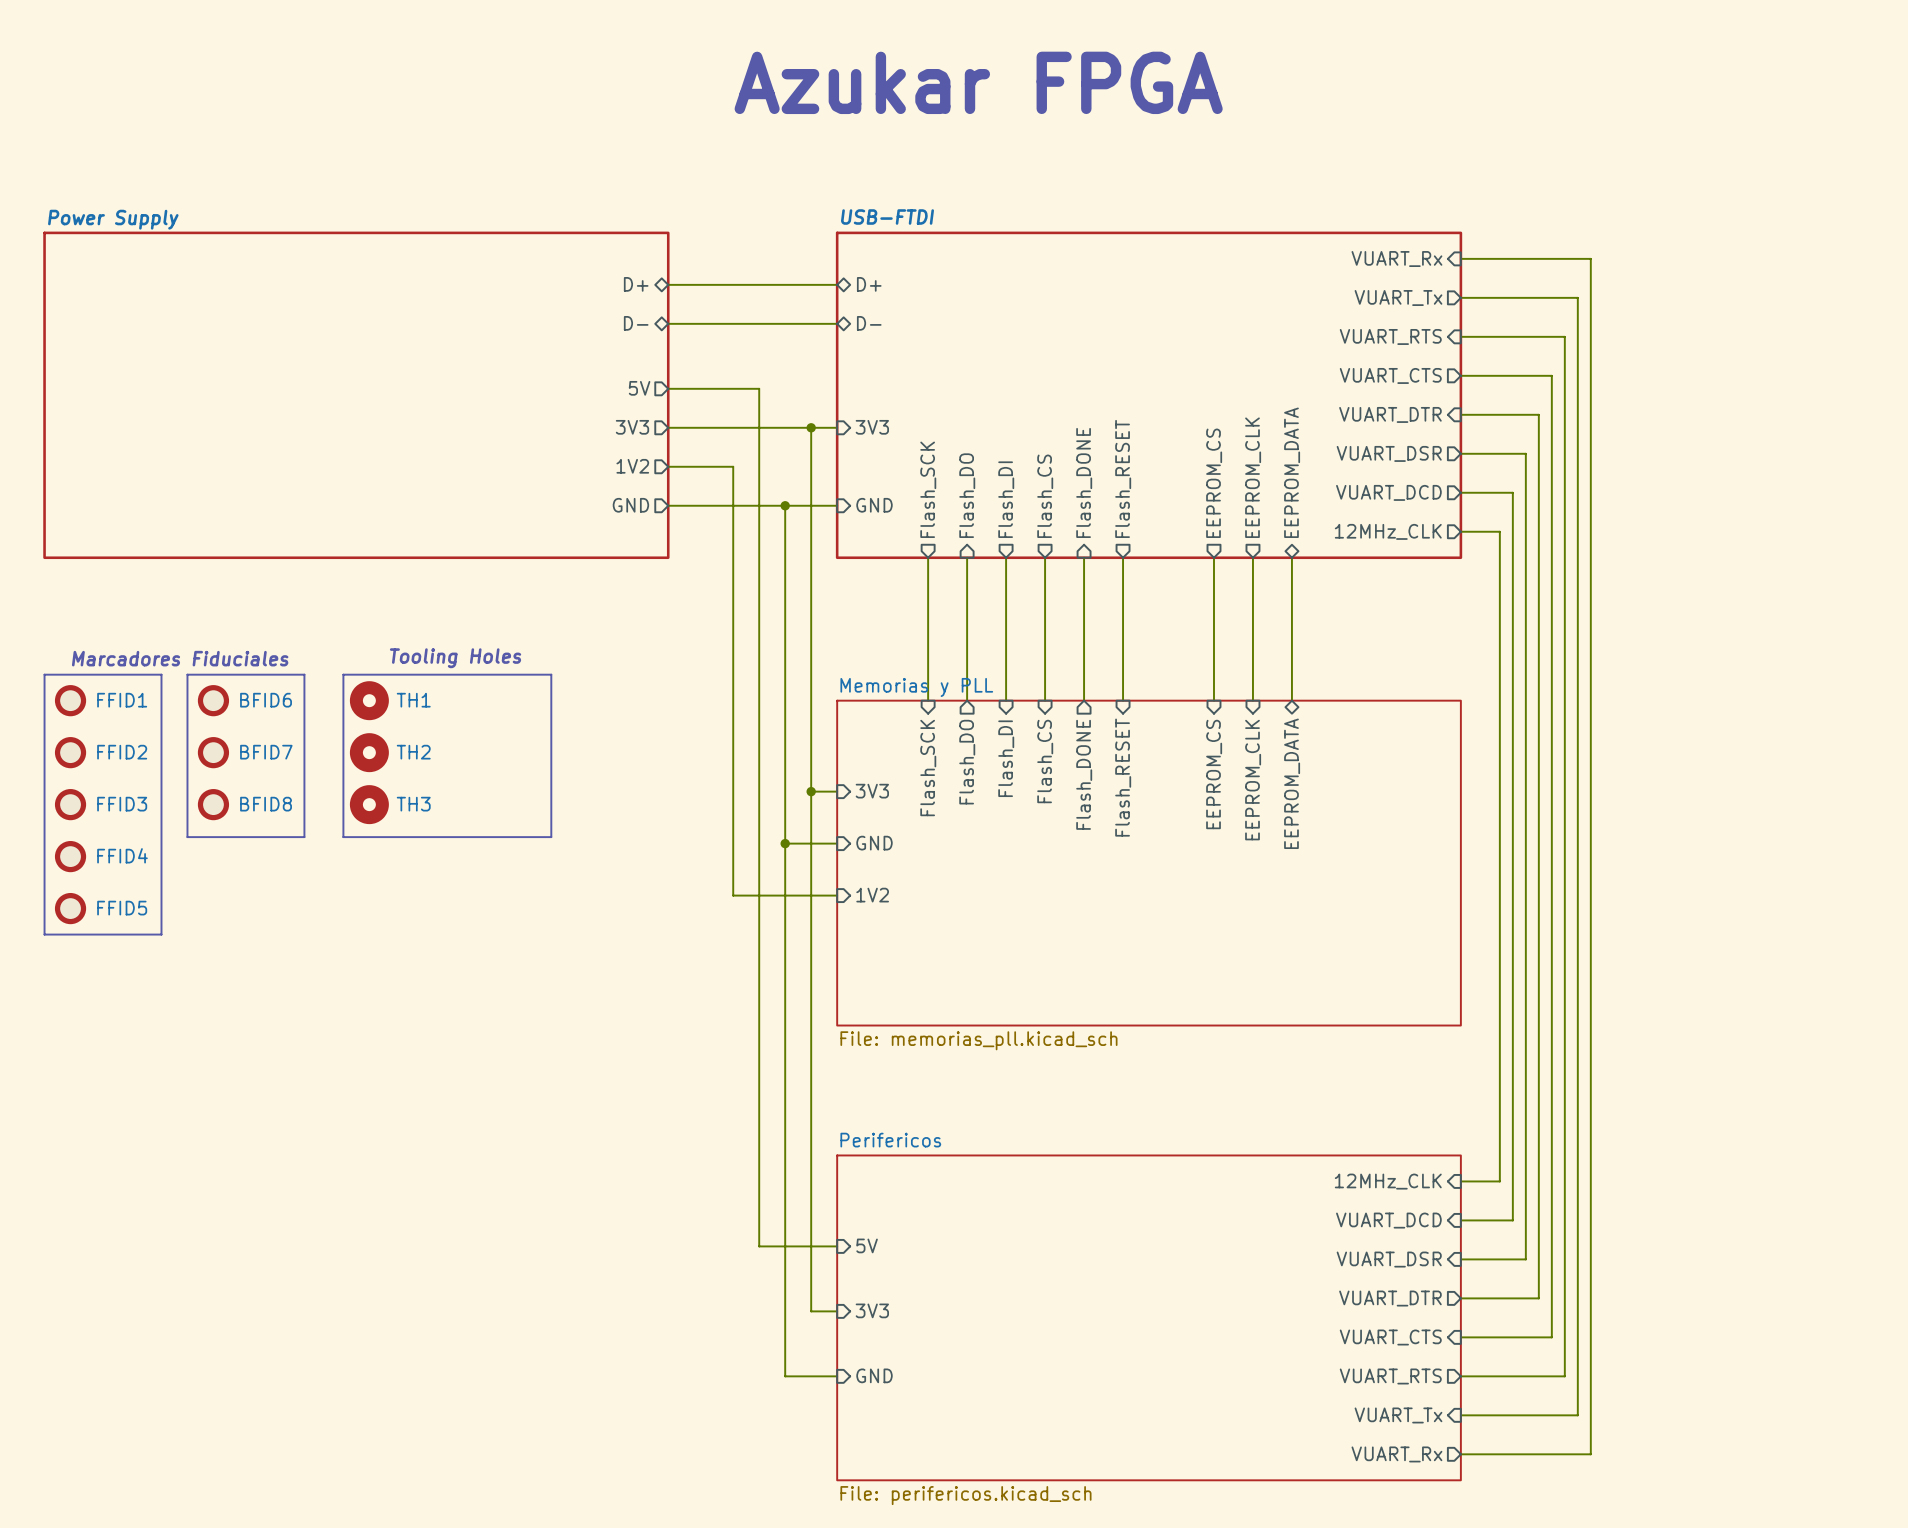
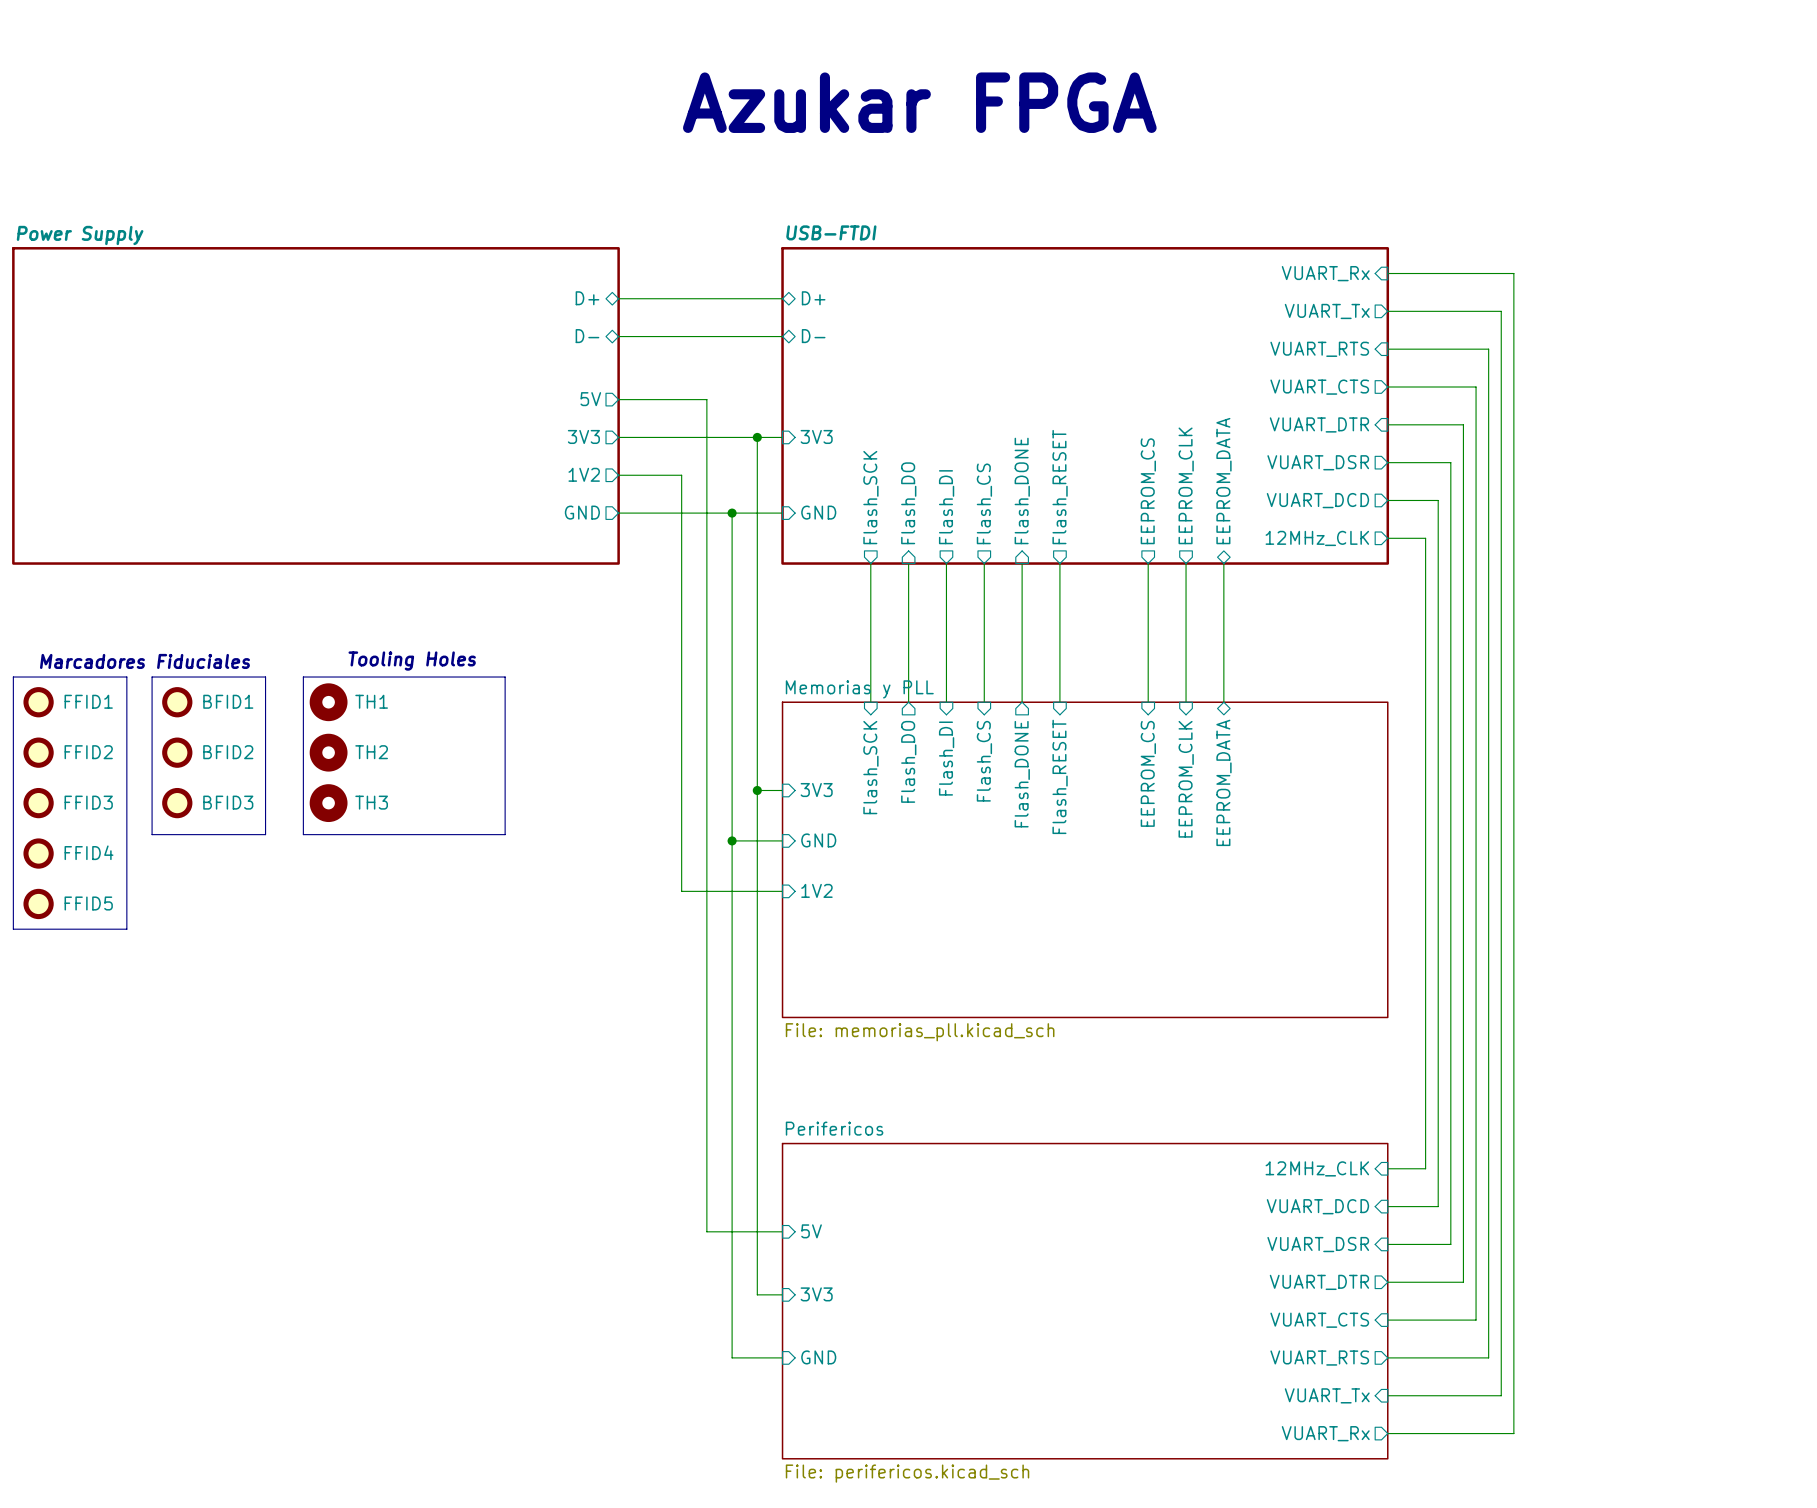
BFID6 name: BFID6 (266, 700) -> BFID1 (228, 701)
BFID7 name: BFID7 (266, 752) -> BFID2 (228, 752)
BFID8 name: BFID8 (266, 804) -> BFID3 (228, 802)

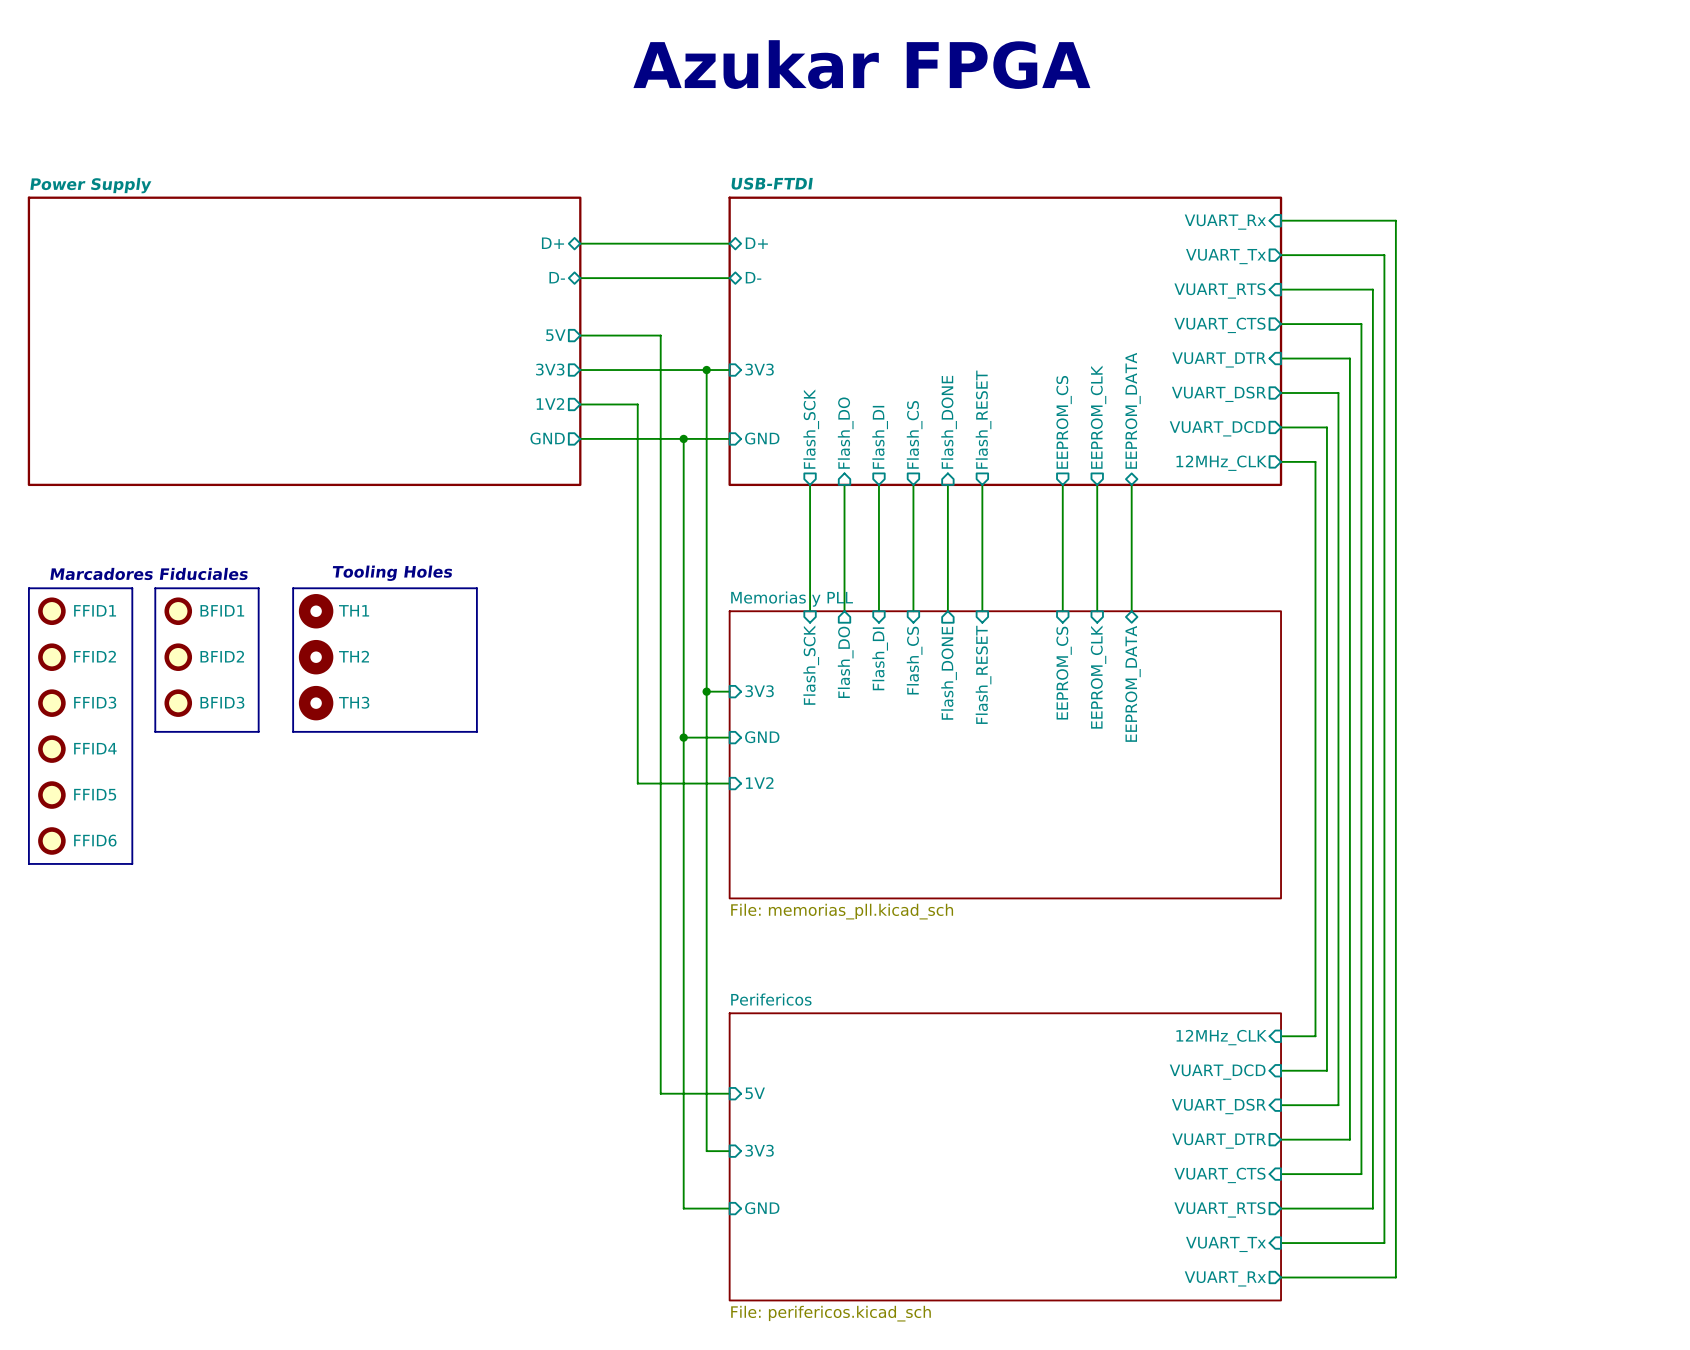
line: (13, 929) (126, 929) -> (28, 818) (28, 863) (132, 863) (132, 818)
FFID6: none -> (51, 840)

